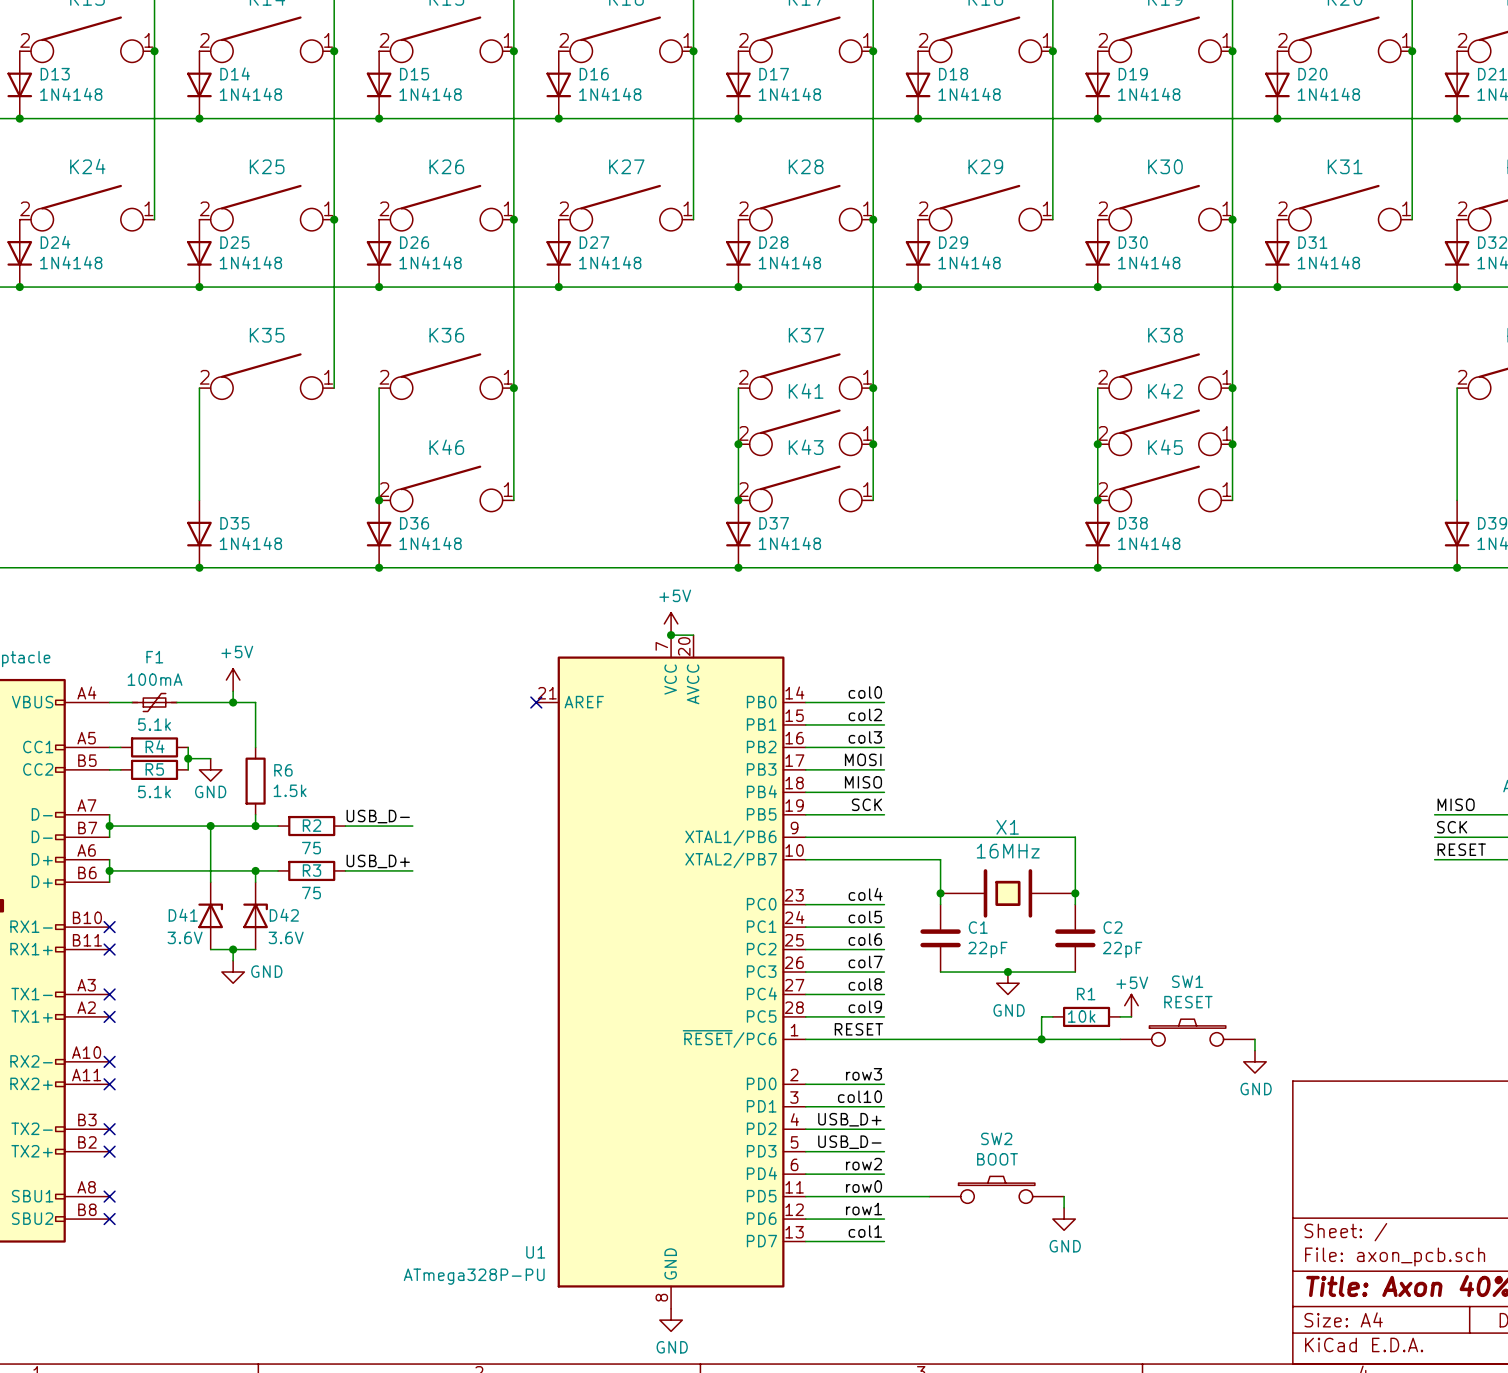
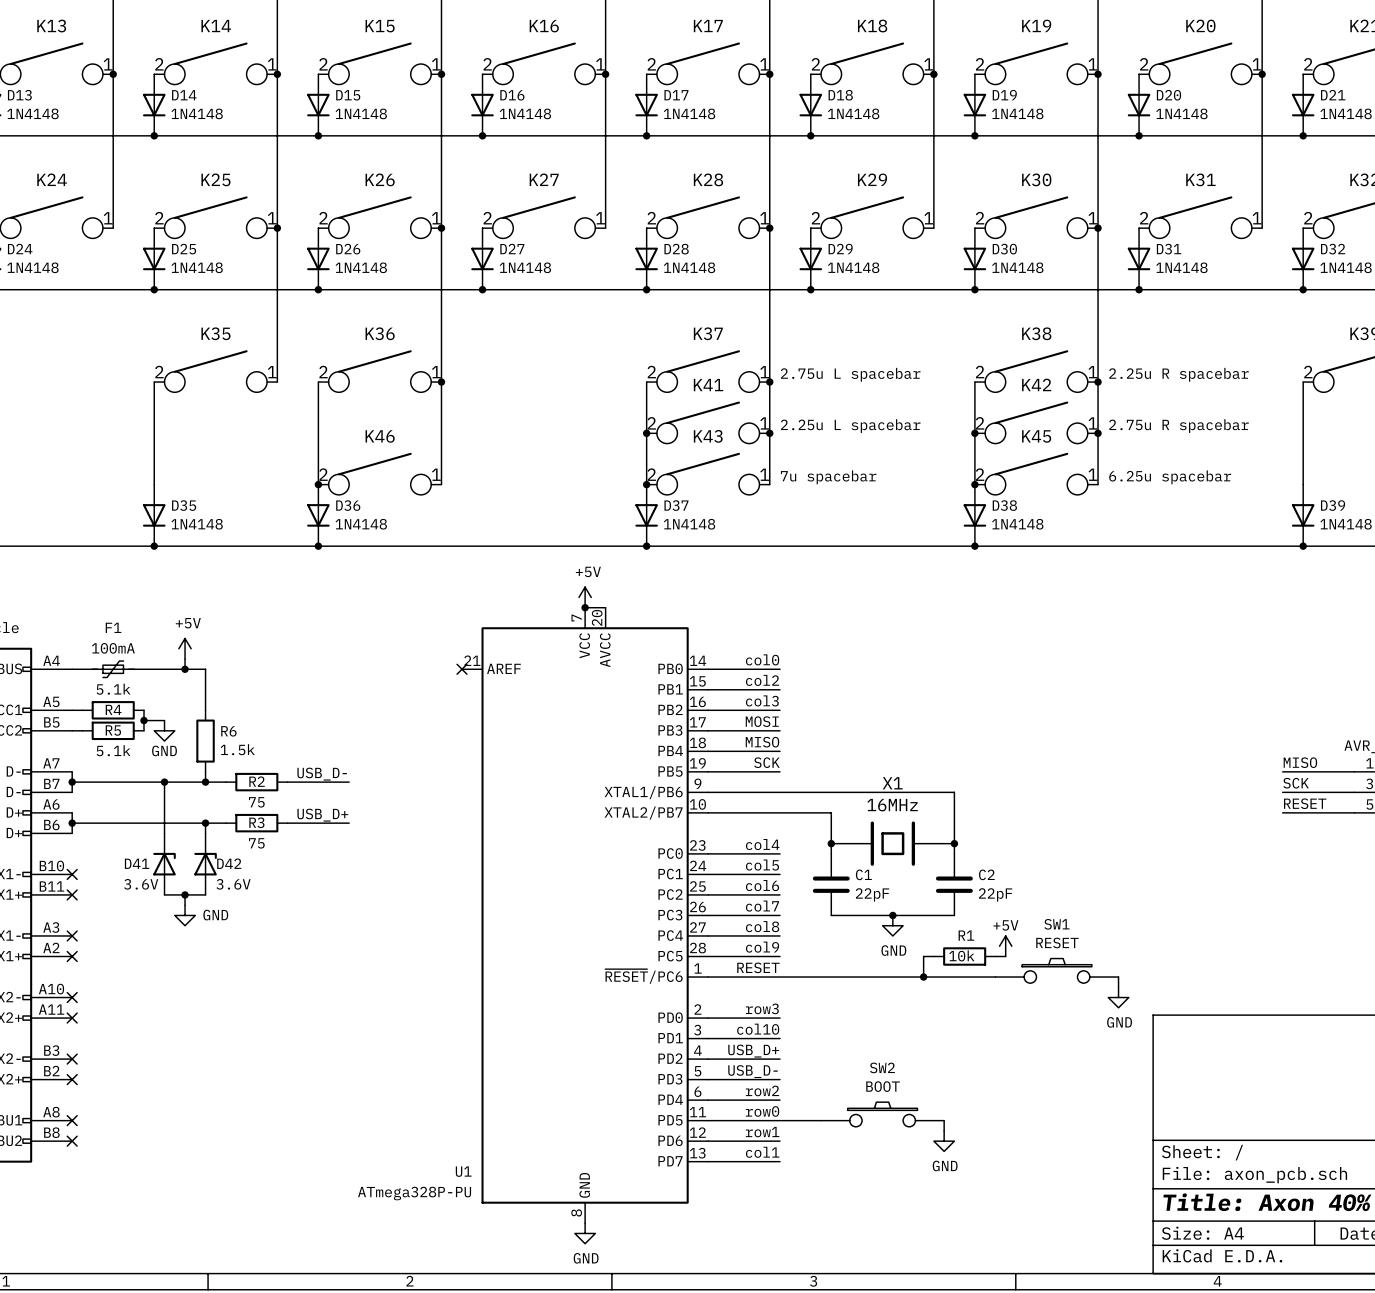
text: none -> 2.75u L spacebar (850, 374)
text: none -> 2.25u R spacebar (1179, 374)
text: none -> 2.25u L spacebar (850, 426)
text: none -> 2.75u R spacebar (1179, 426)
text: none -> 7u spacebar (828, 477)
text: none -> 6.25u spacebar (1170, 477)

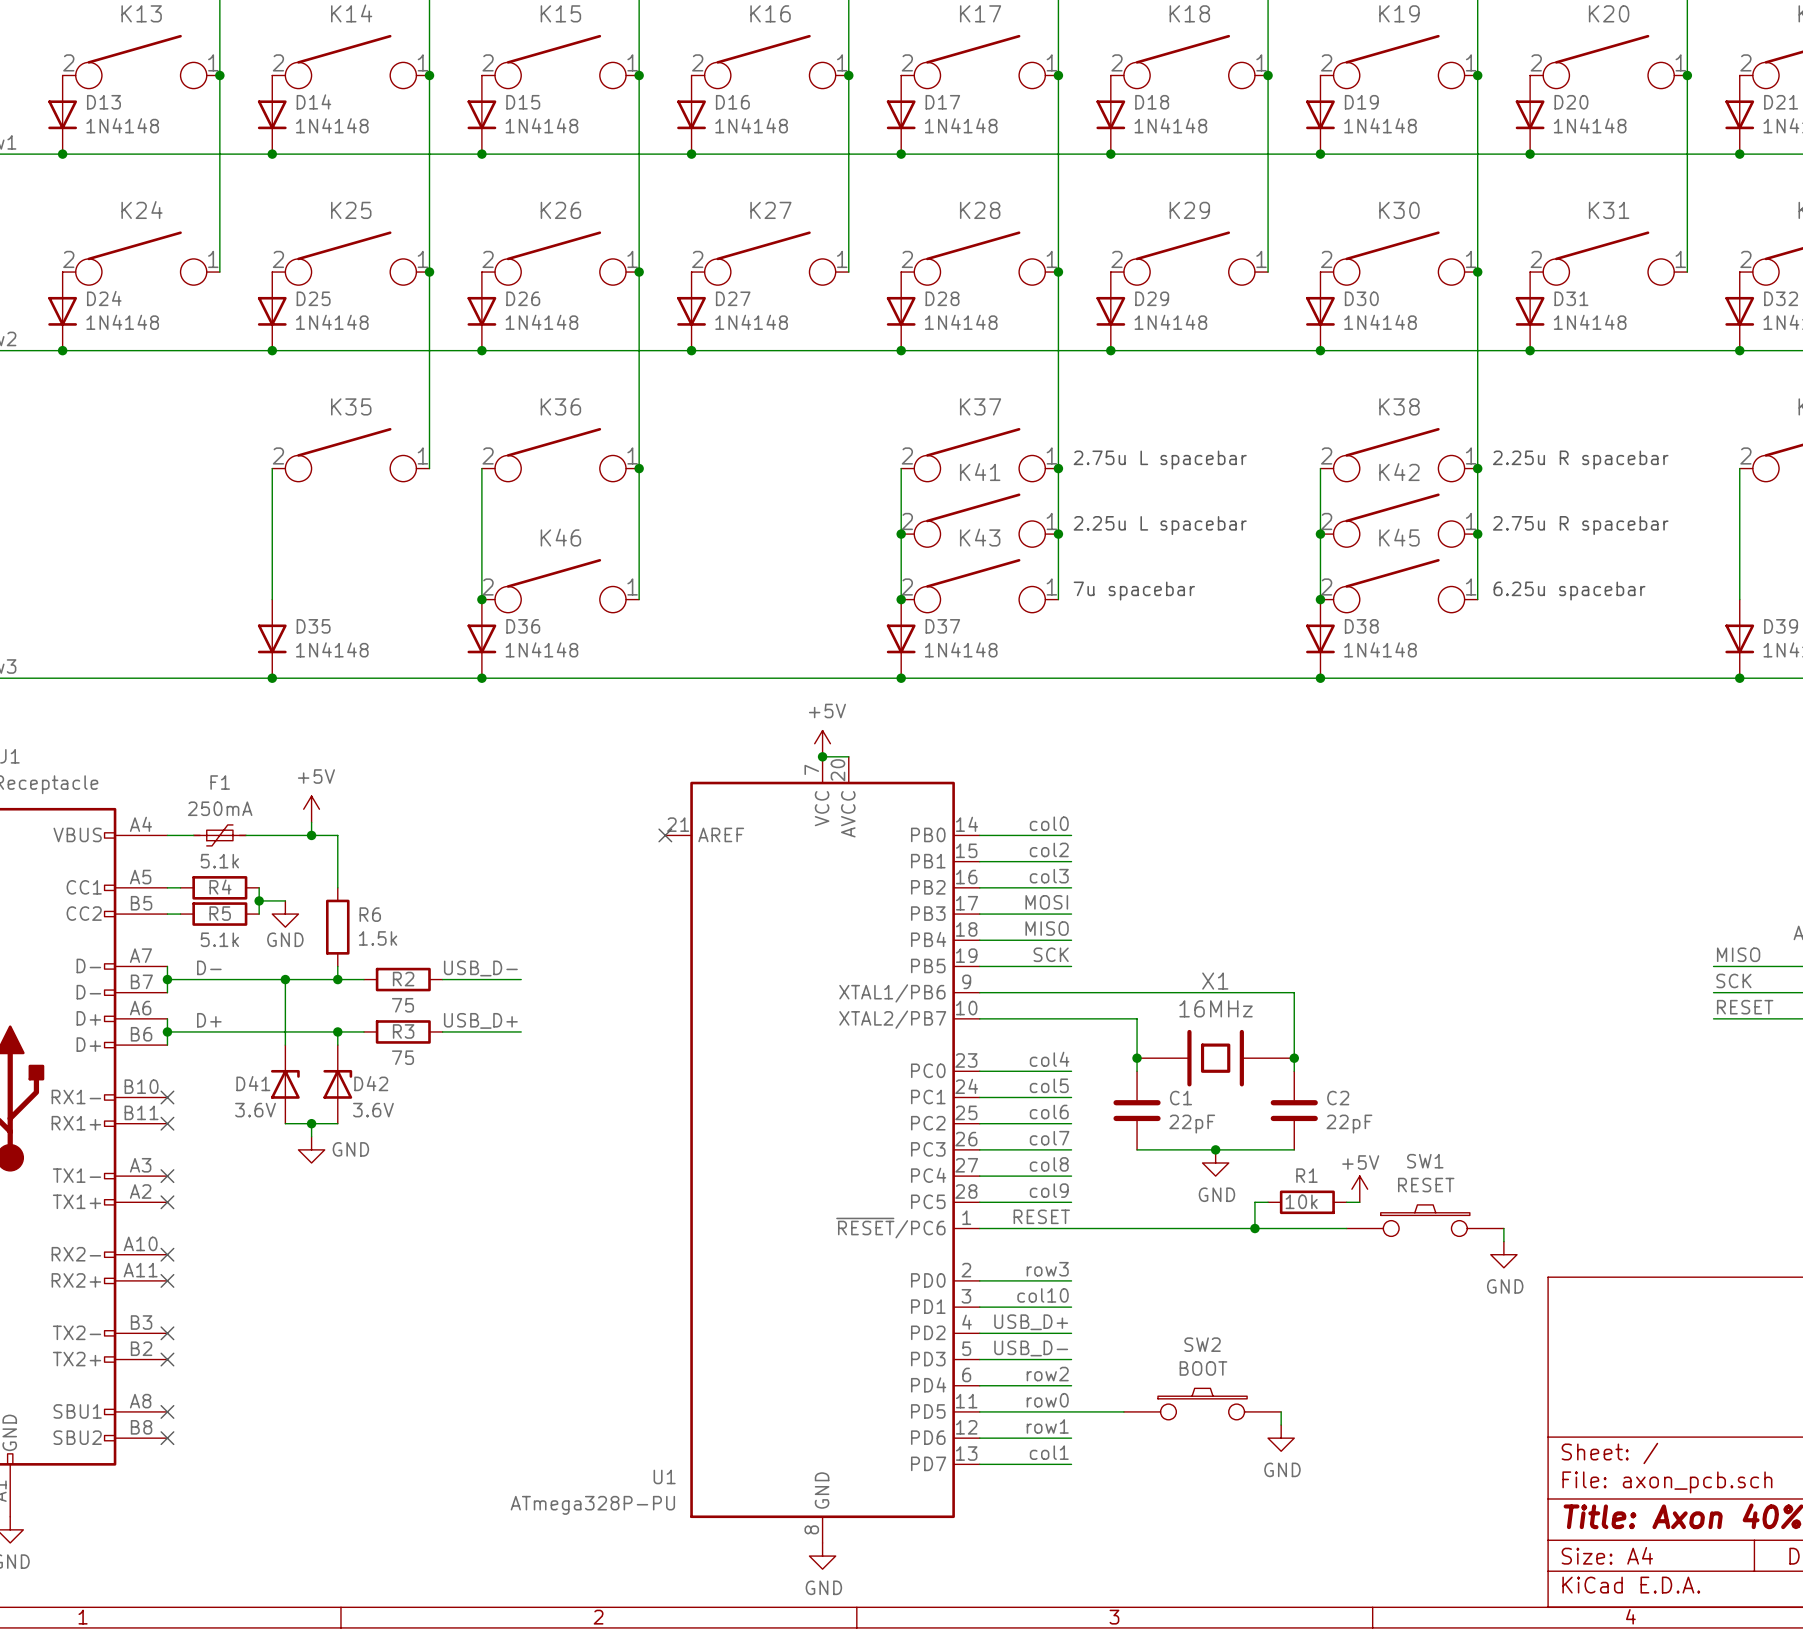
F1 value: 100mA (113, 648) -> 250mA (220, 808)
label: none -> D- (209, 967)
label: none -> D+ (209, 1020)

